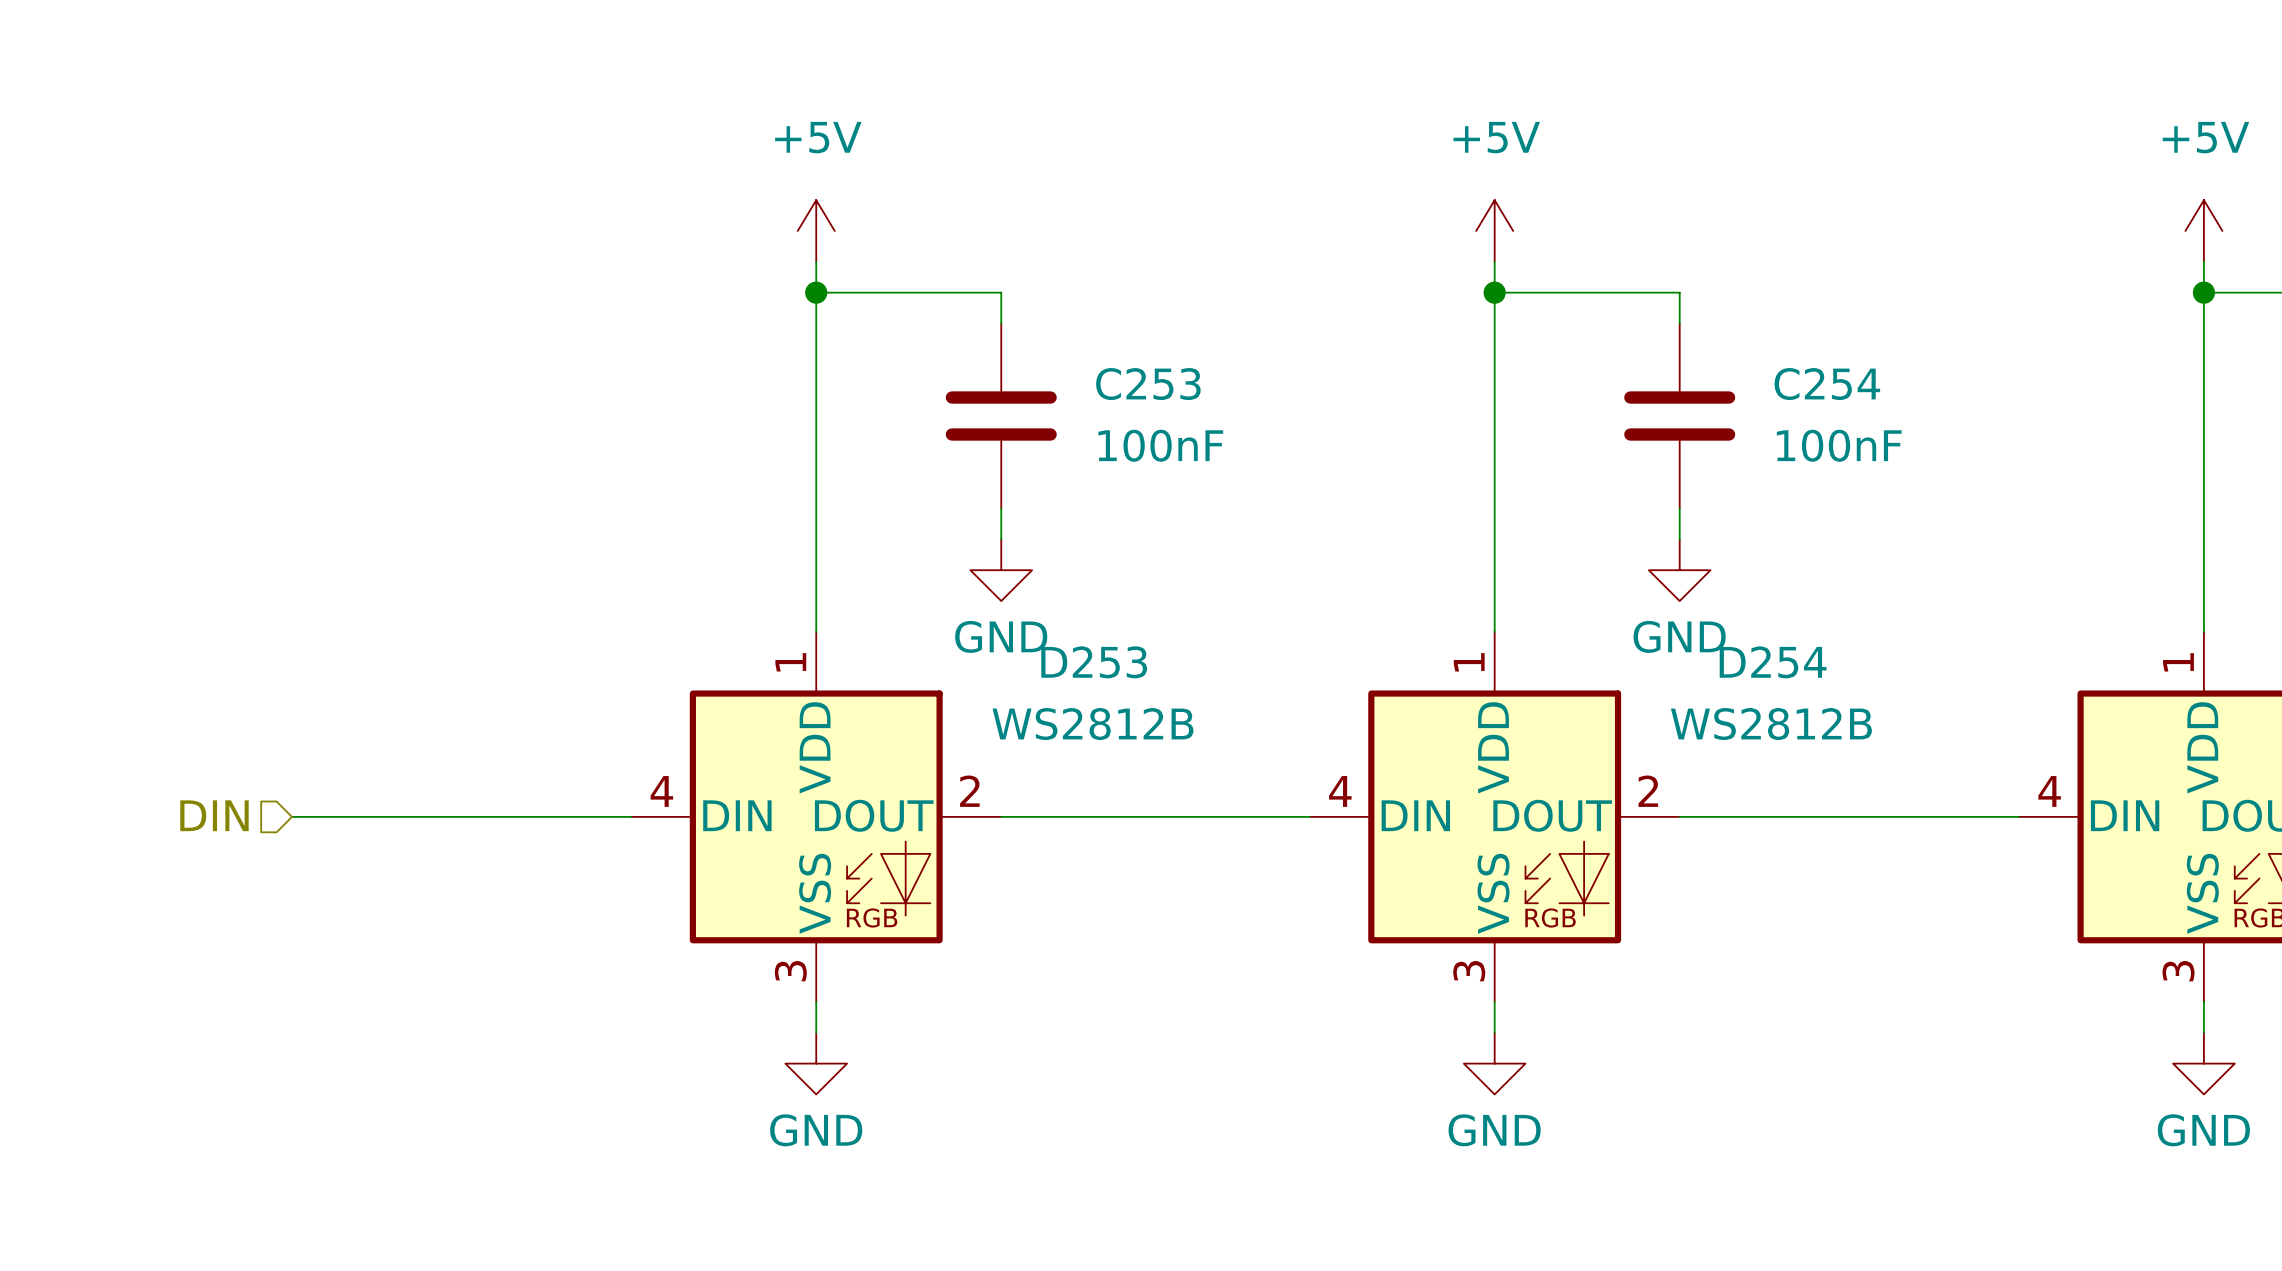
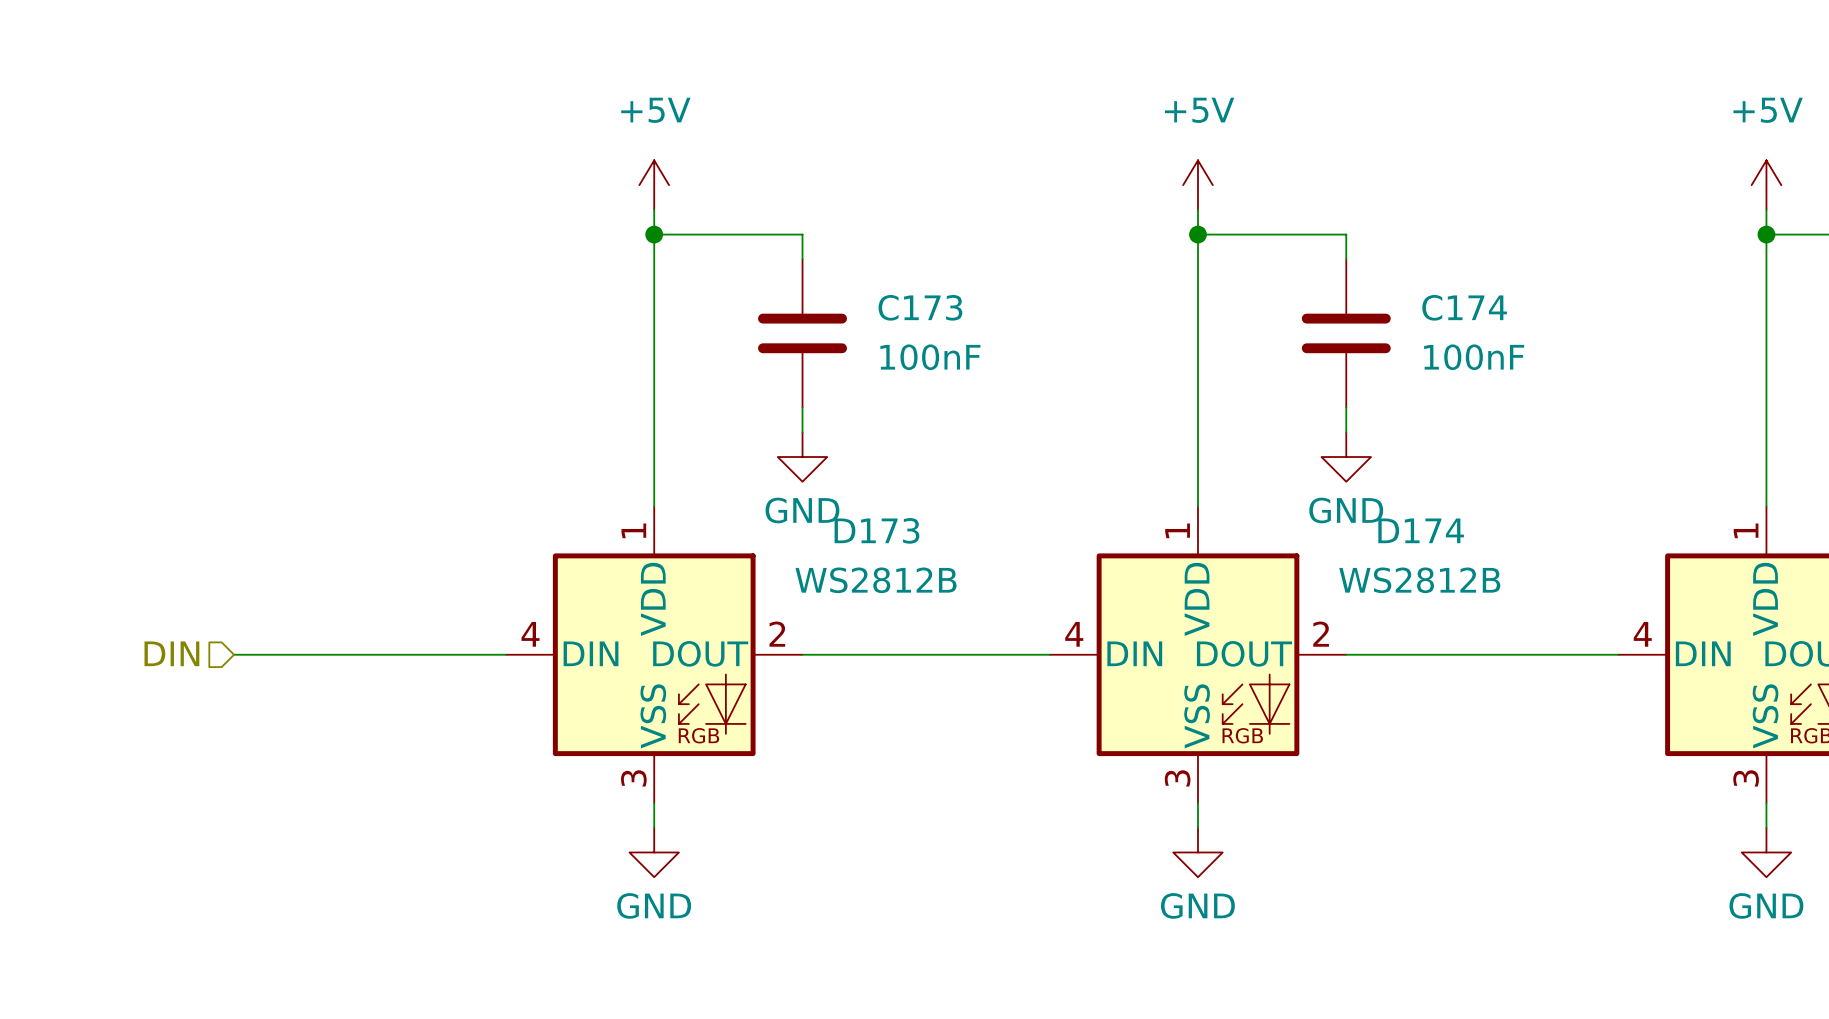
C253 name: C253 (1148, 384) -> C173 (920, 307)
C254 name: C254 (1827, 384) -> C174 (1464, 307)
D253 name: D253 (1094, 662) -> D173 (876, 530)
D254 name: D254 (1773, 662) -> D174 (1421, 530)

